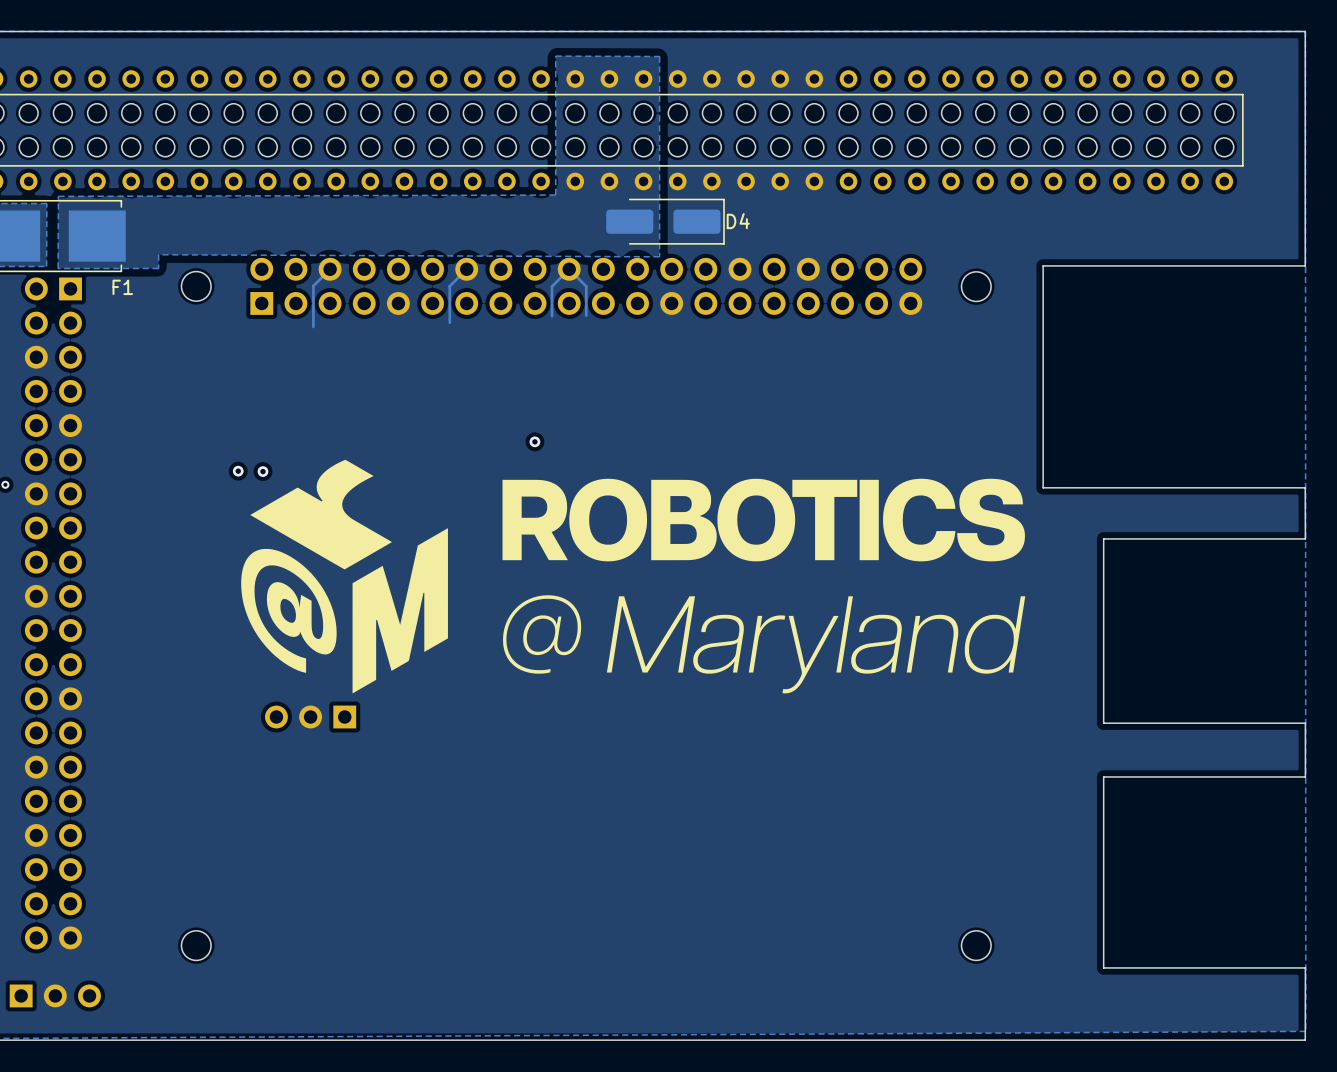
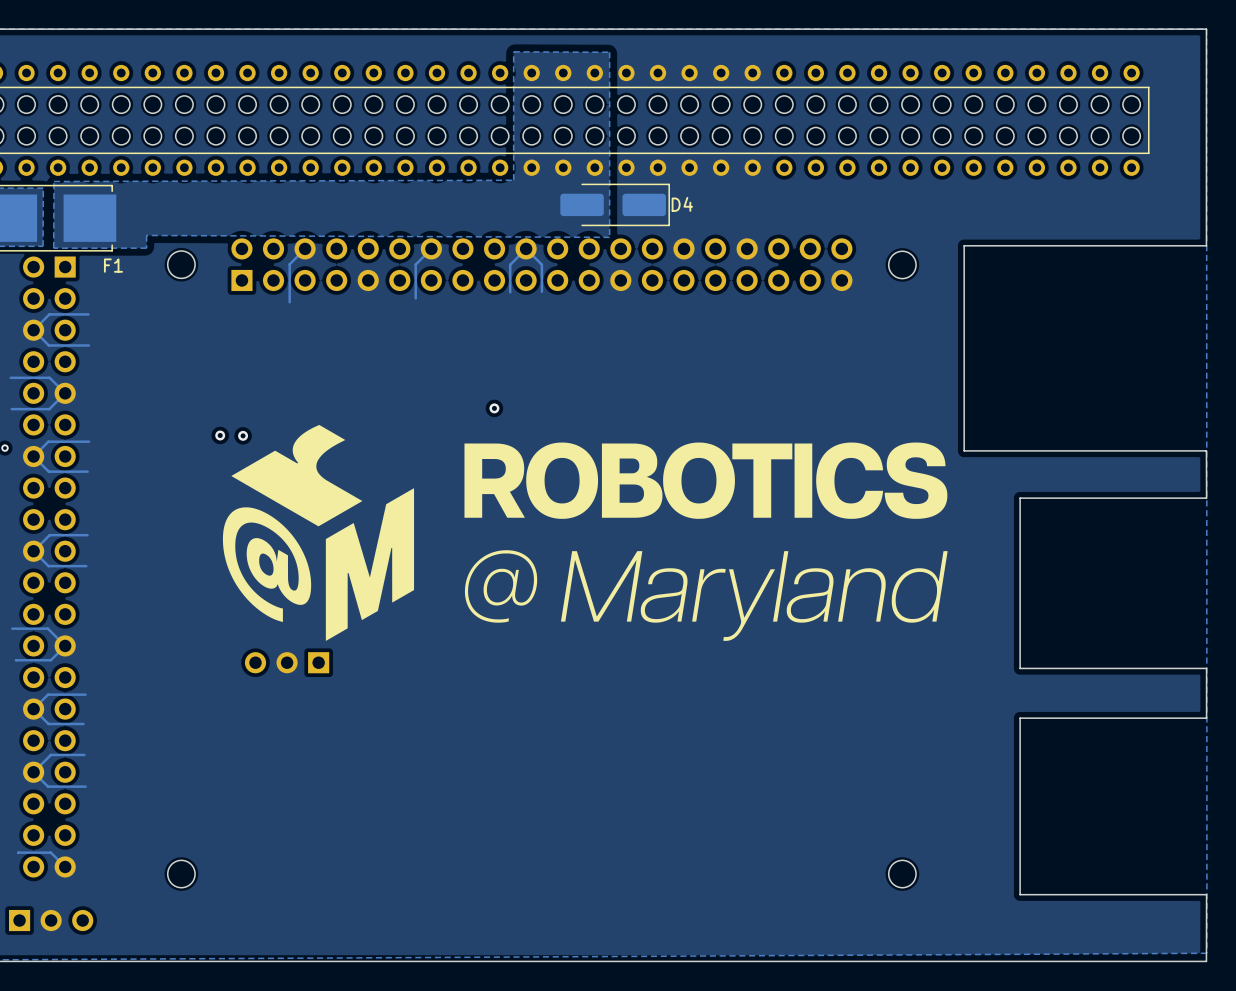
track: none -> (88, 314) (49, 314) (33, 330) (48, 345) (88, 345)
track: none -> (10, 377) (49, 377) (65, 393) (49, 409) (11, 409)
track: none -> (89, 441) (48, 441) (33, 456) (48, 471) (87, 471)
track: none -> (87, 535) (49, 535) (33, 551) (48, 566) (86, 566)
track: none -> (12, 628) (47, 628) (65, 645) (50, 660) (16, 660)
track: none -> (85, 694) (48, 694) (33, 709) (48, 724) (83, 724)
track: none -> (84, 754) (50, 754) (33, 772) (48, 786) (85, 786)
track: none -> (18, 852) (50, 852) (65, 866)

